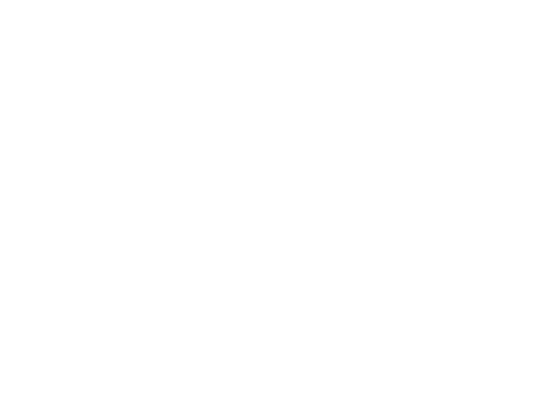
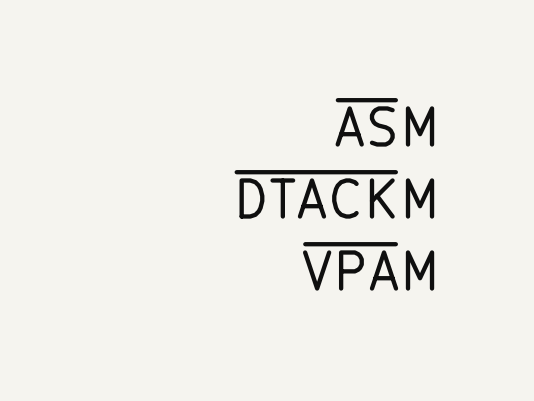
label: none -> ~{AS}M (384, 122)
label: none -> ~{DTACK}M (334, 194)
label: none -> ~{VPA}M (368, 266)

